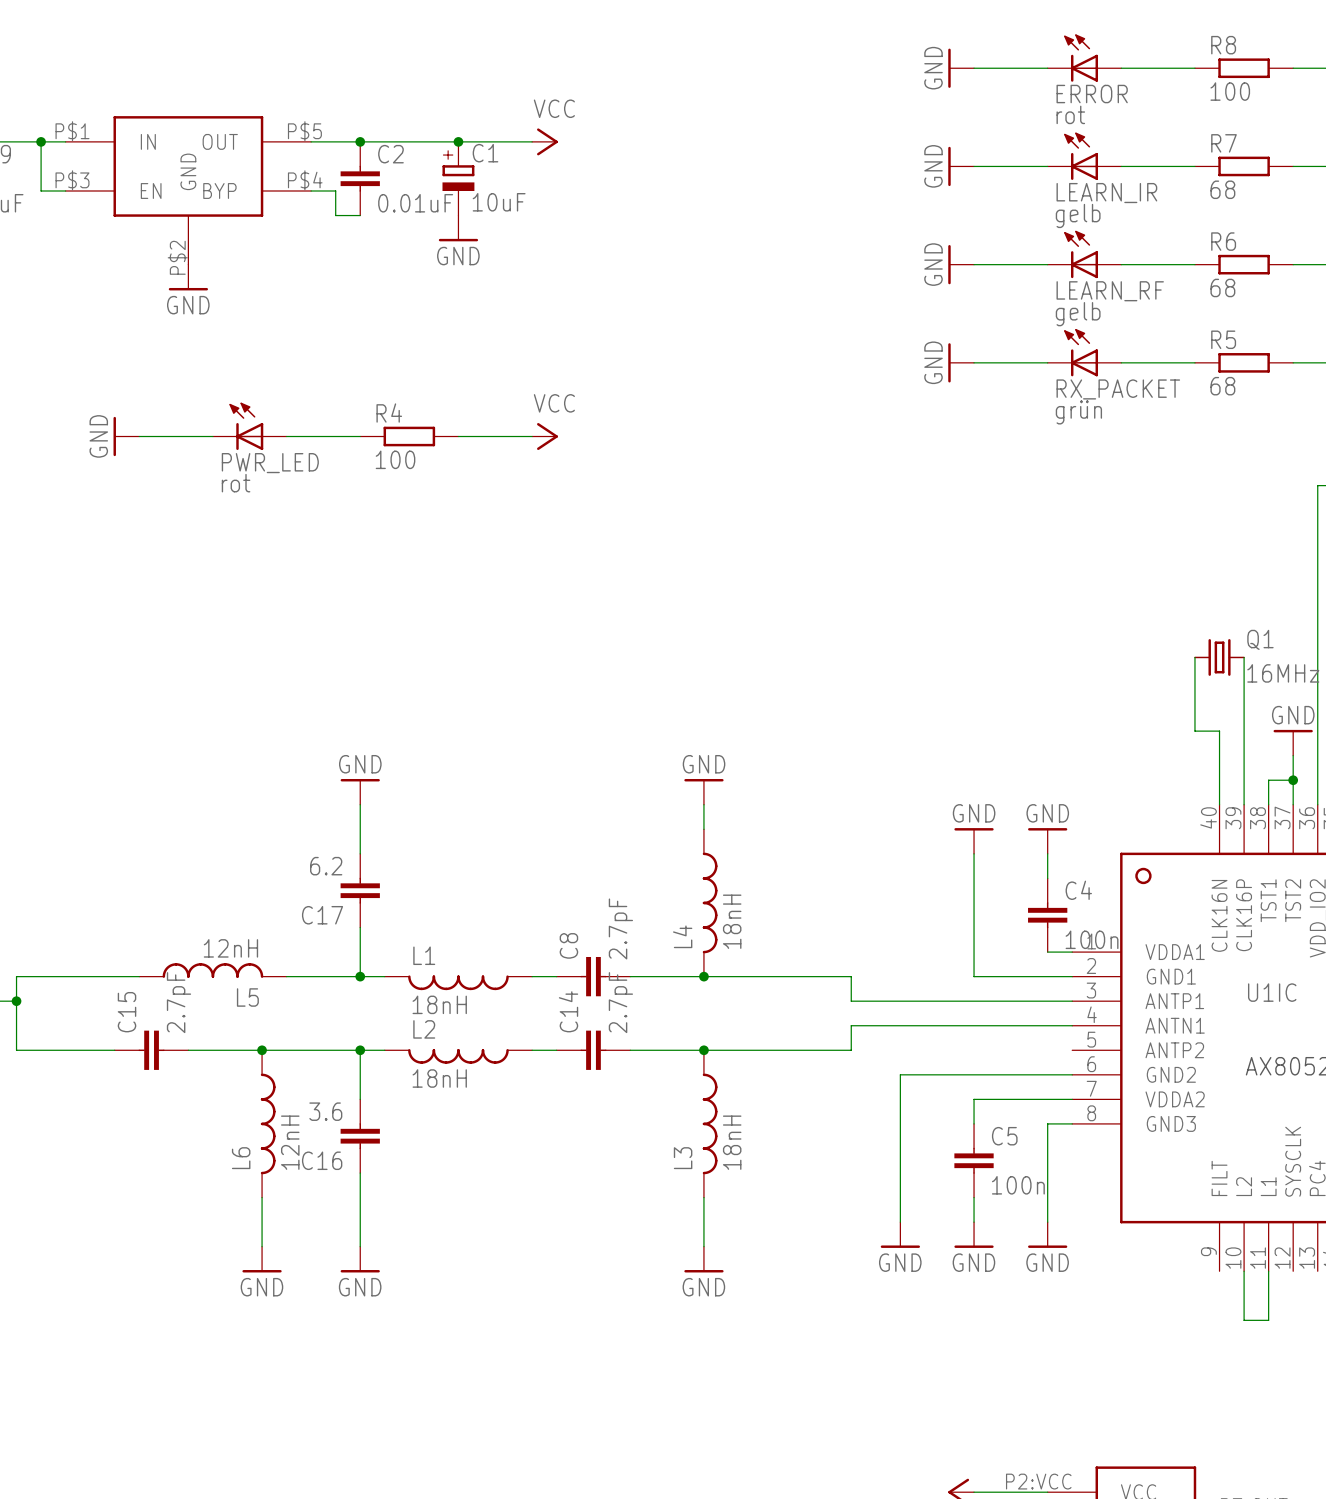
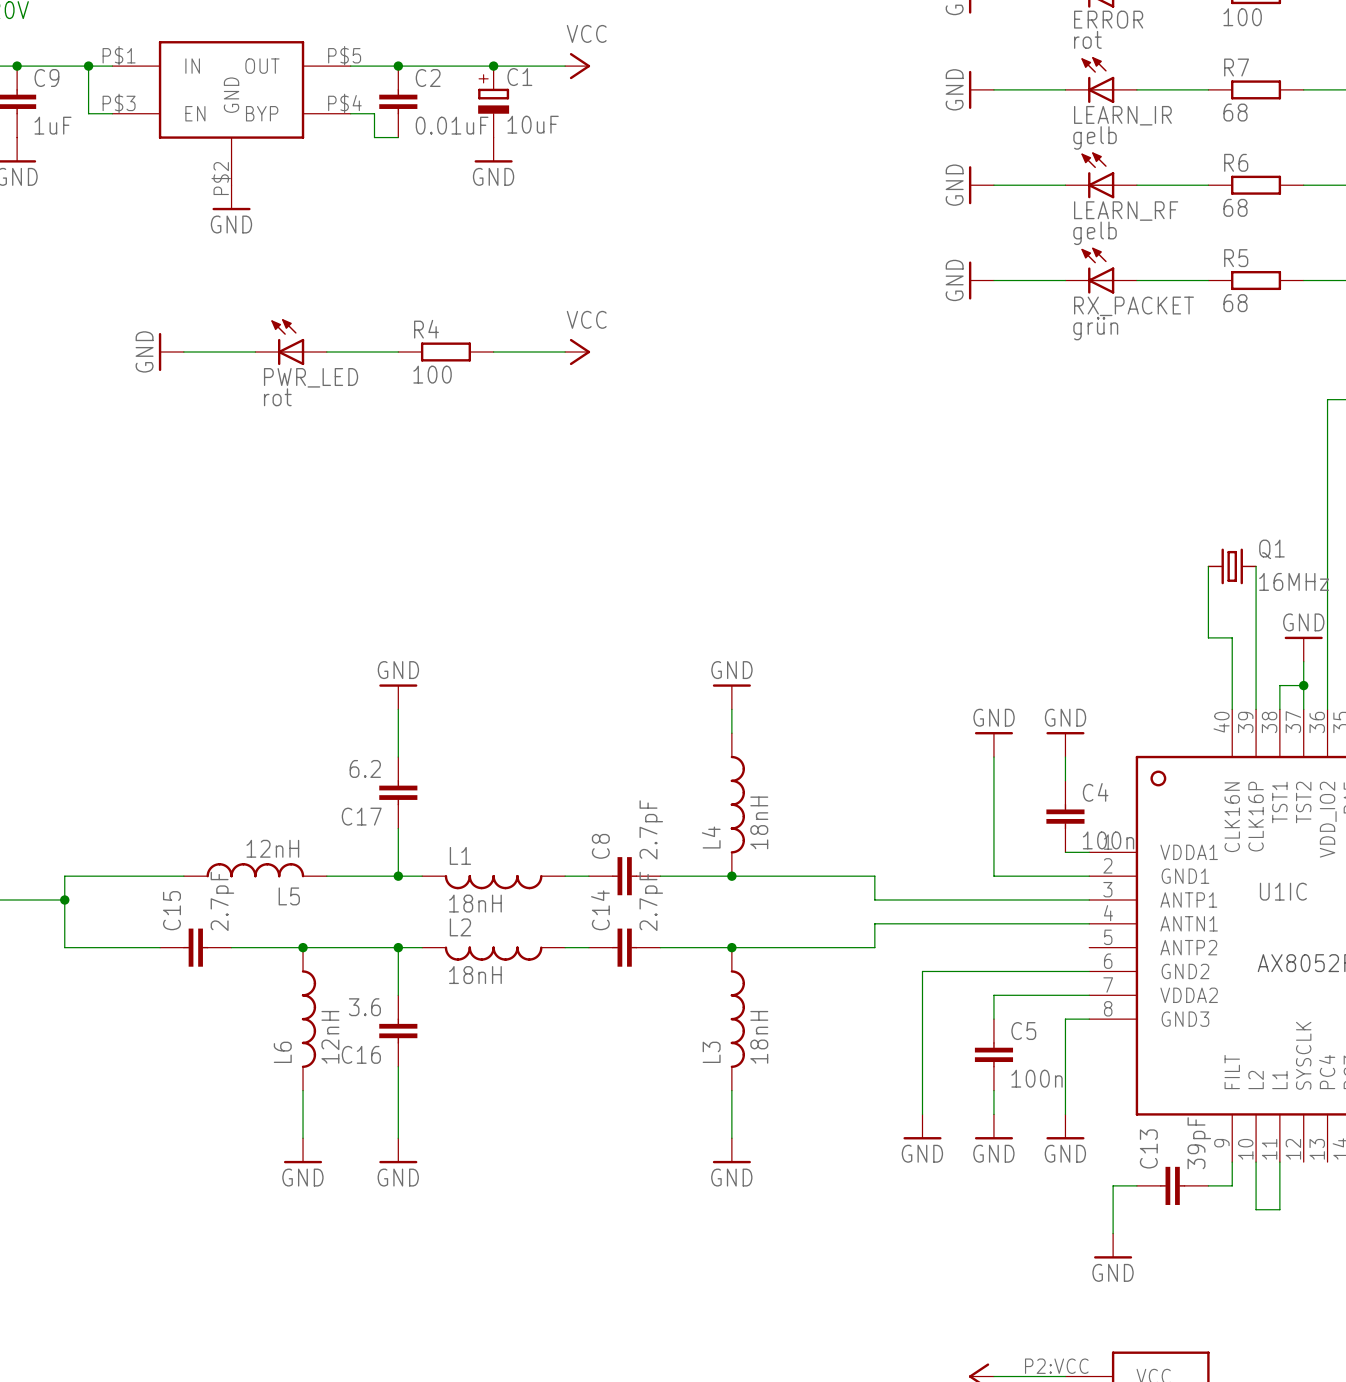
wire: none -> (1232, 1162) (1232, 1185) (1208, 1185)
wire: none -> (1136, 1185) (1113, 1185) (1113, 1233)
C13: none -> 39pF (1172, 1185)
power symbol: none -> GND (1113, 1246)

